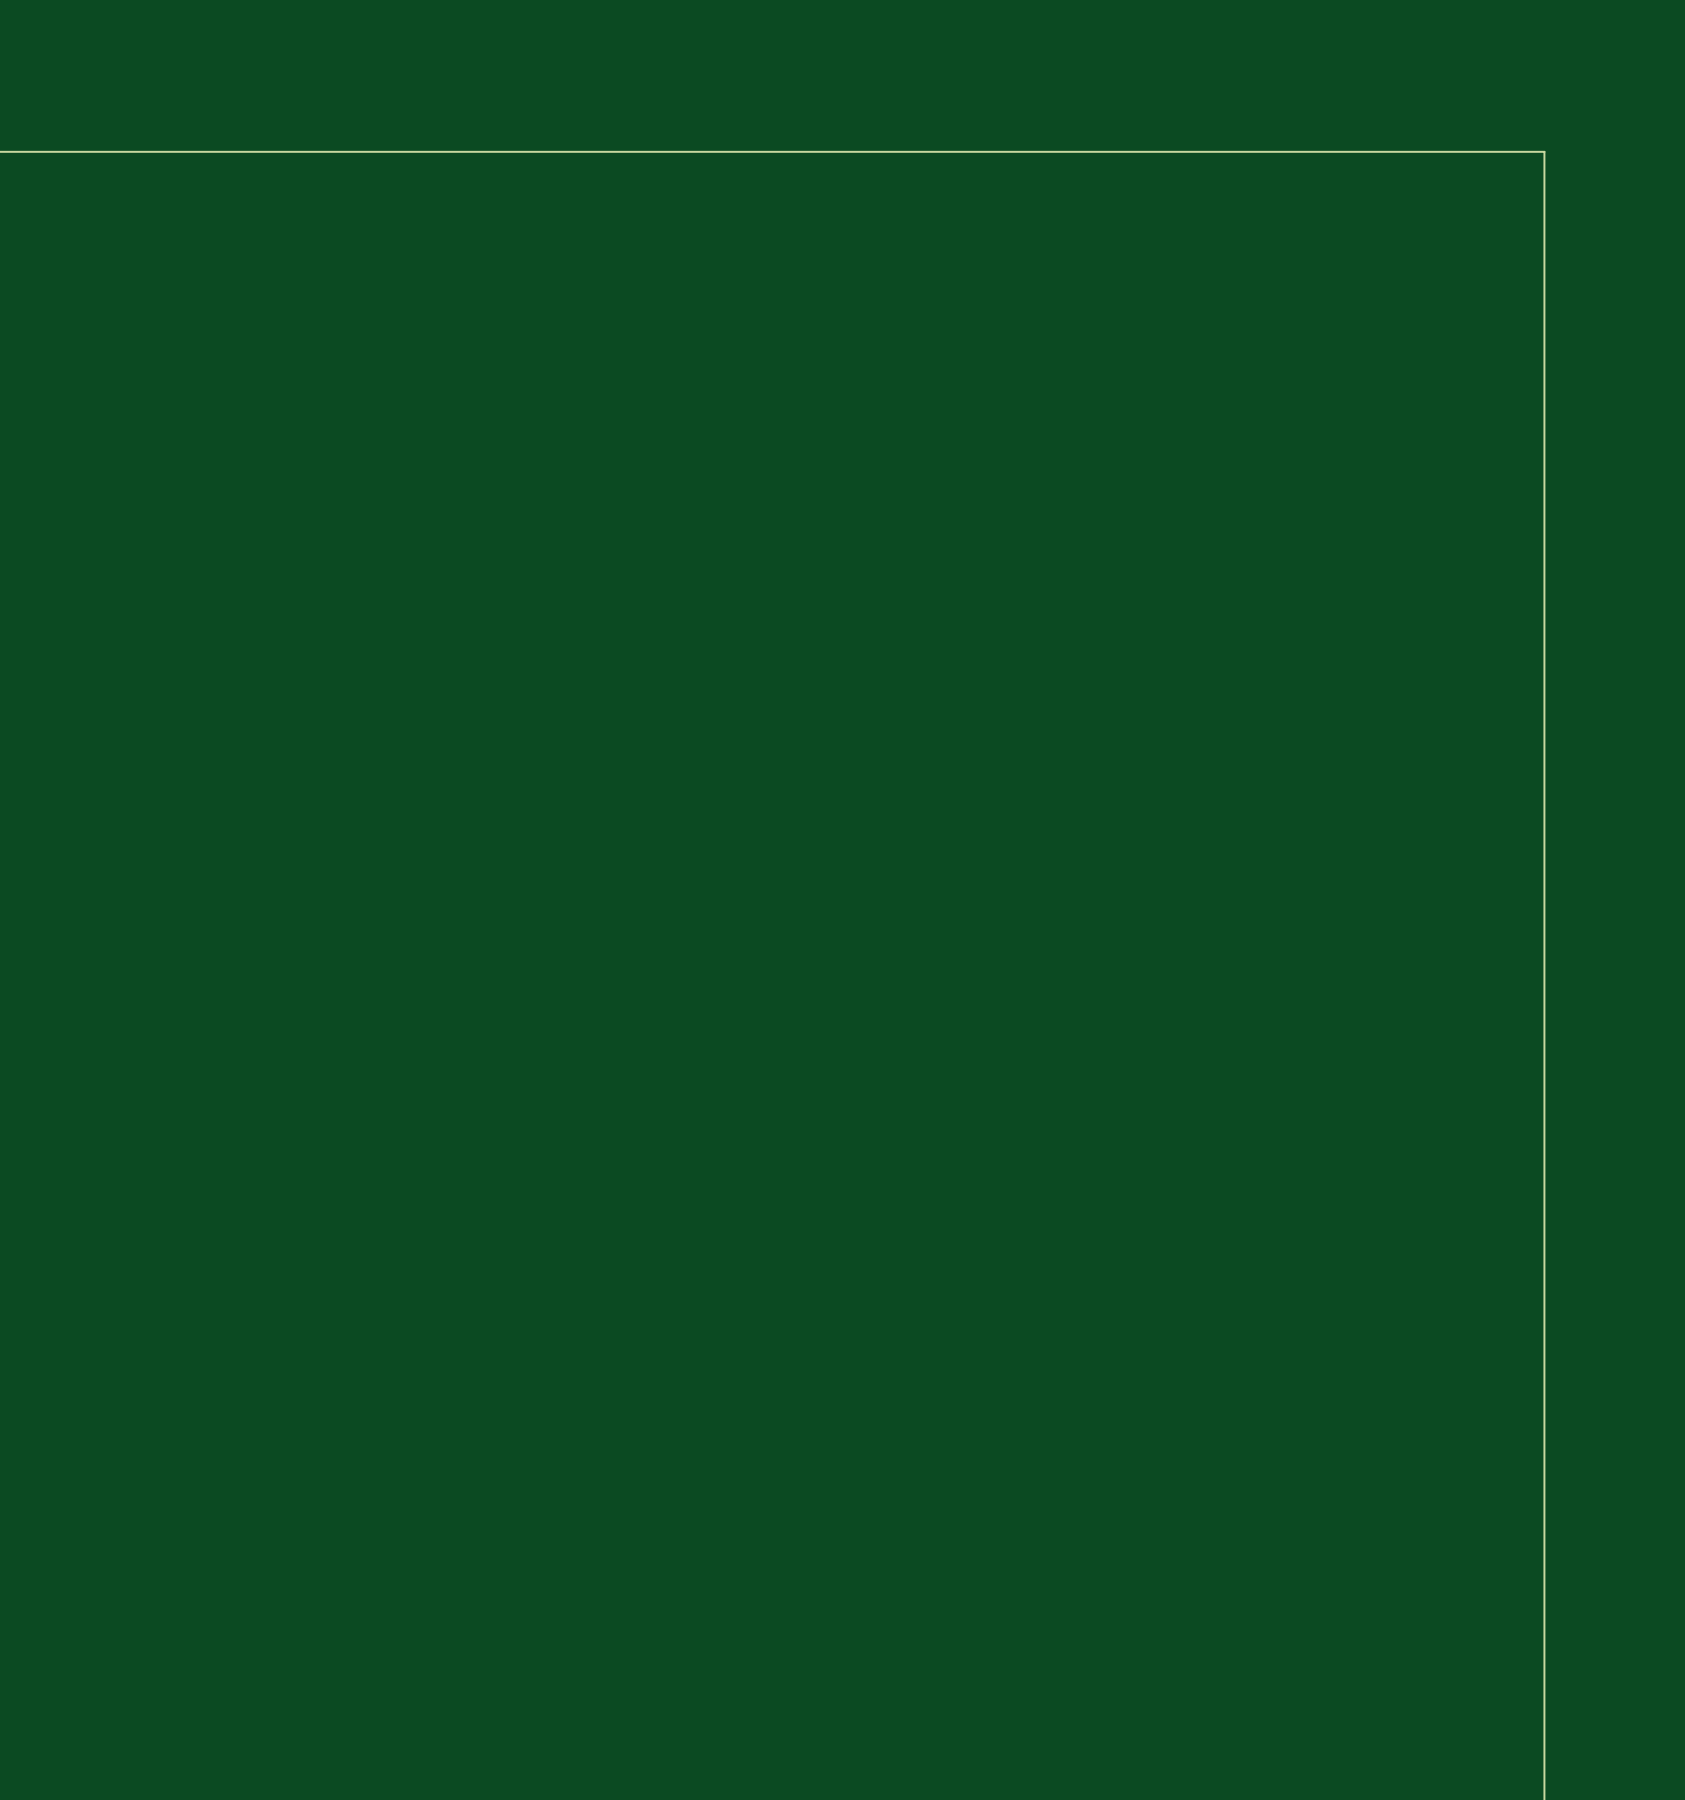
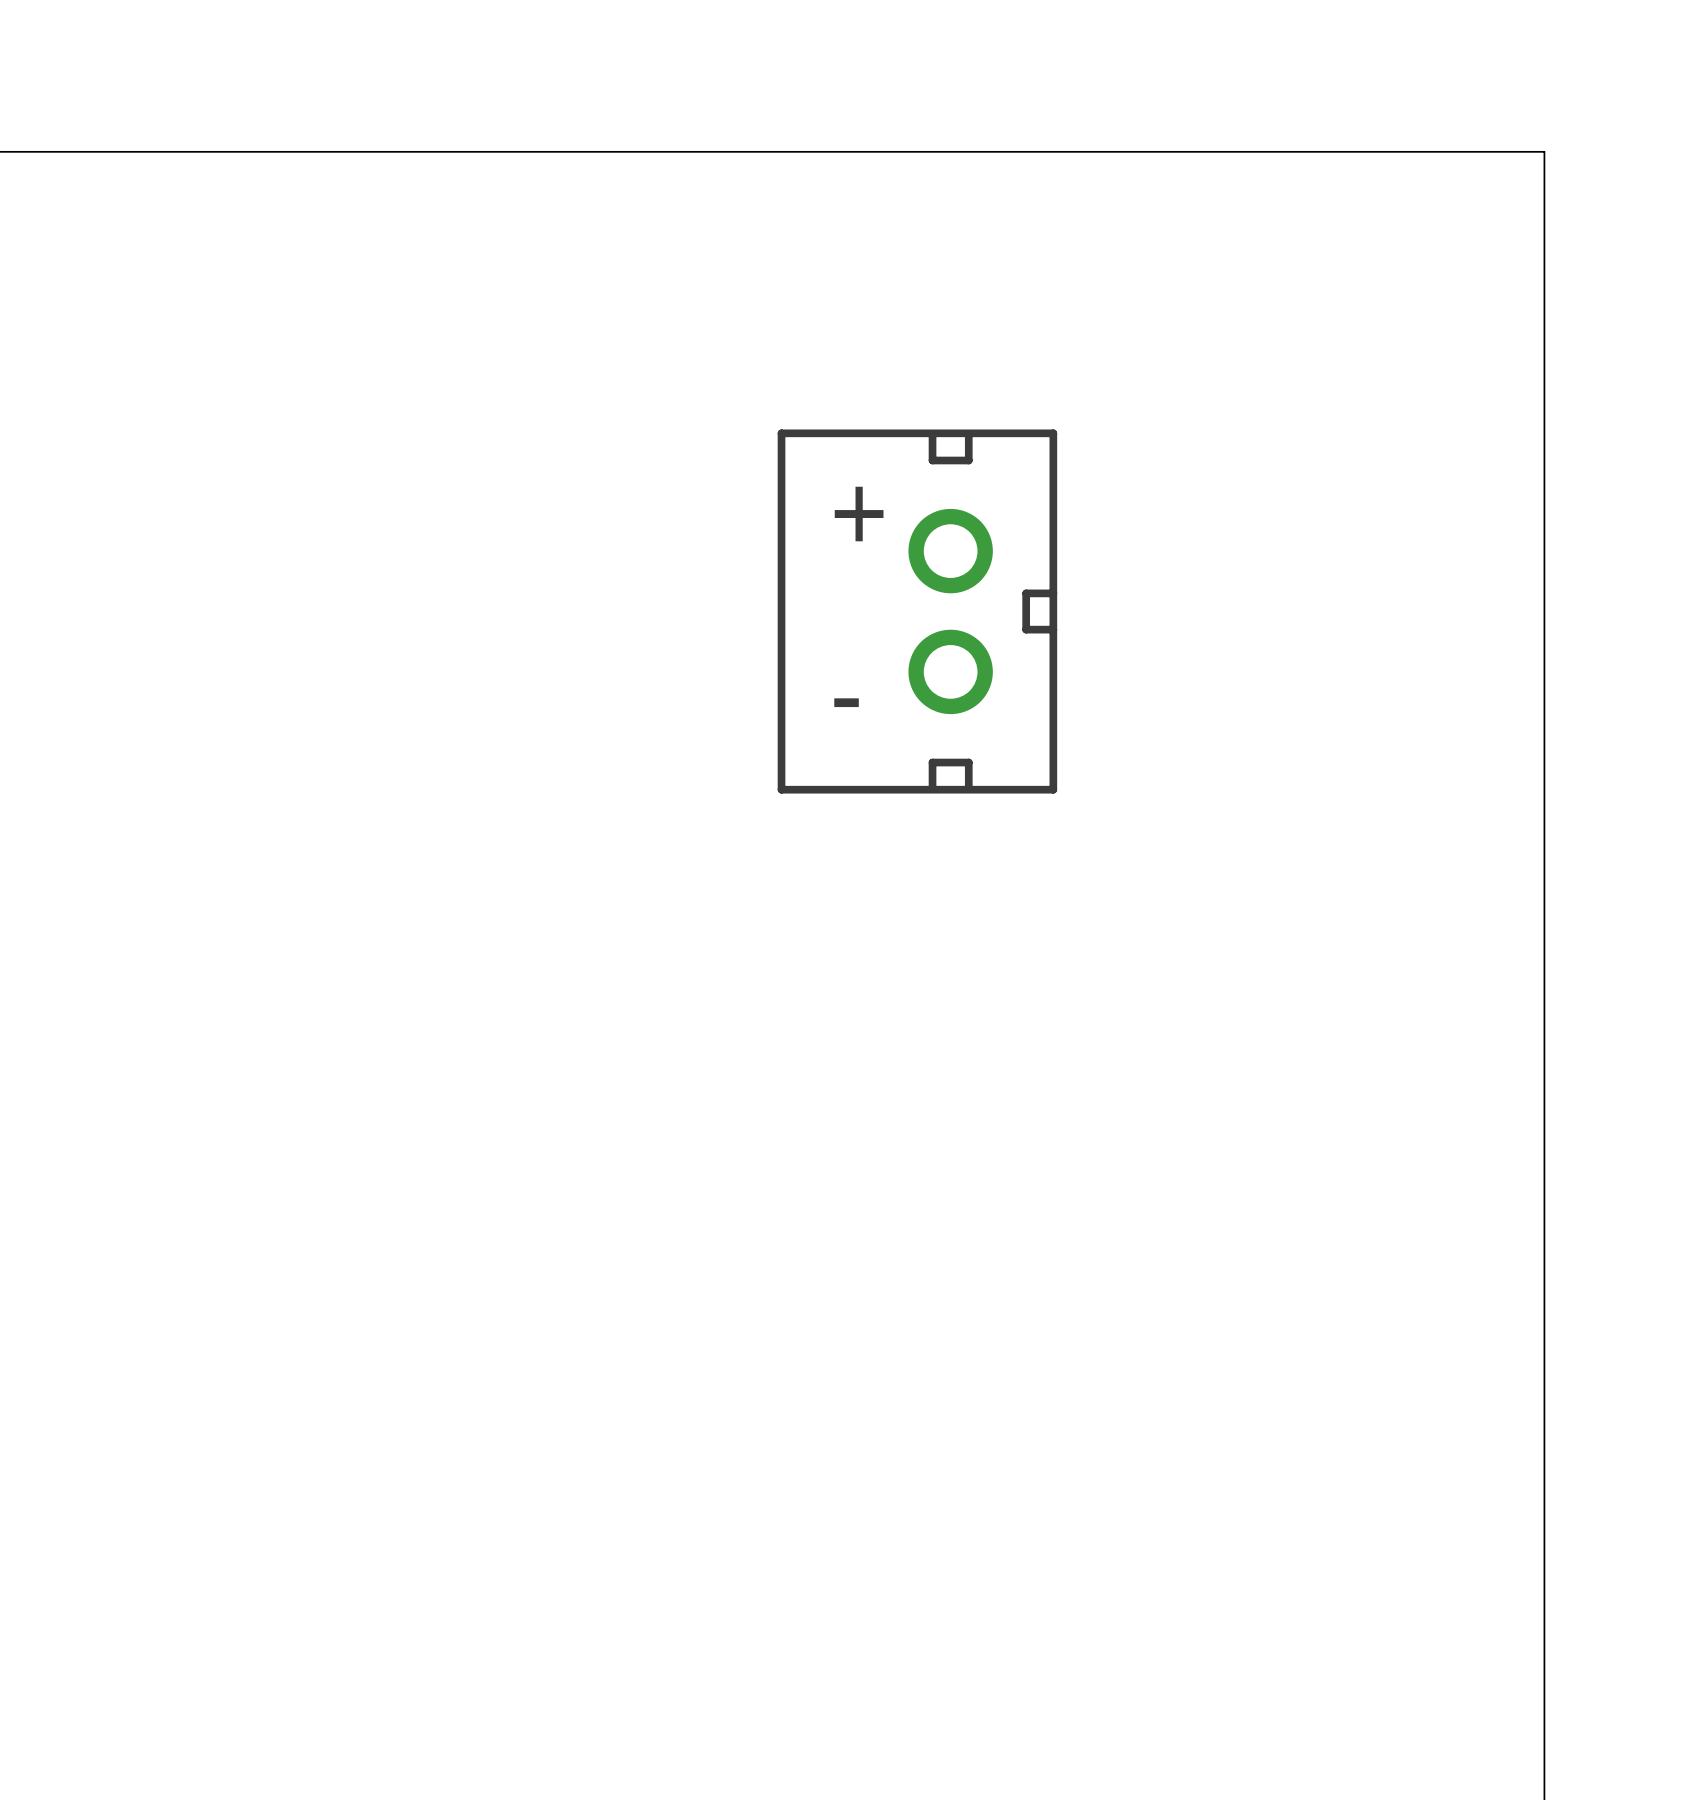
part: none -> (917, 611)

